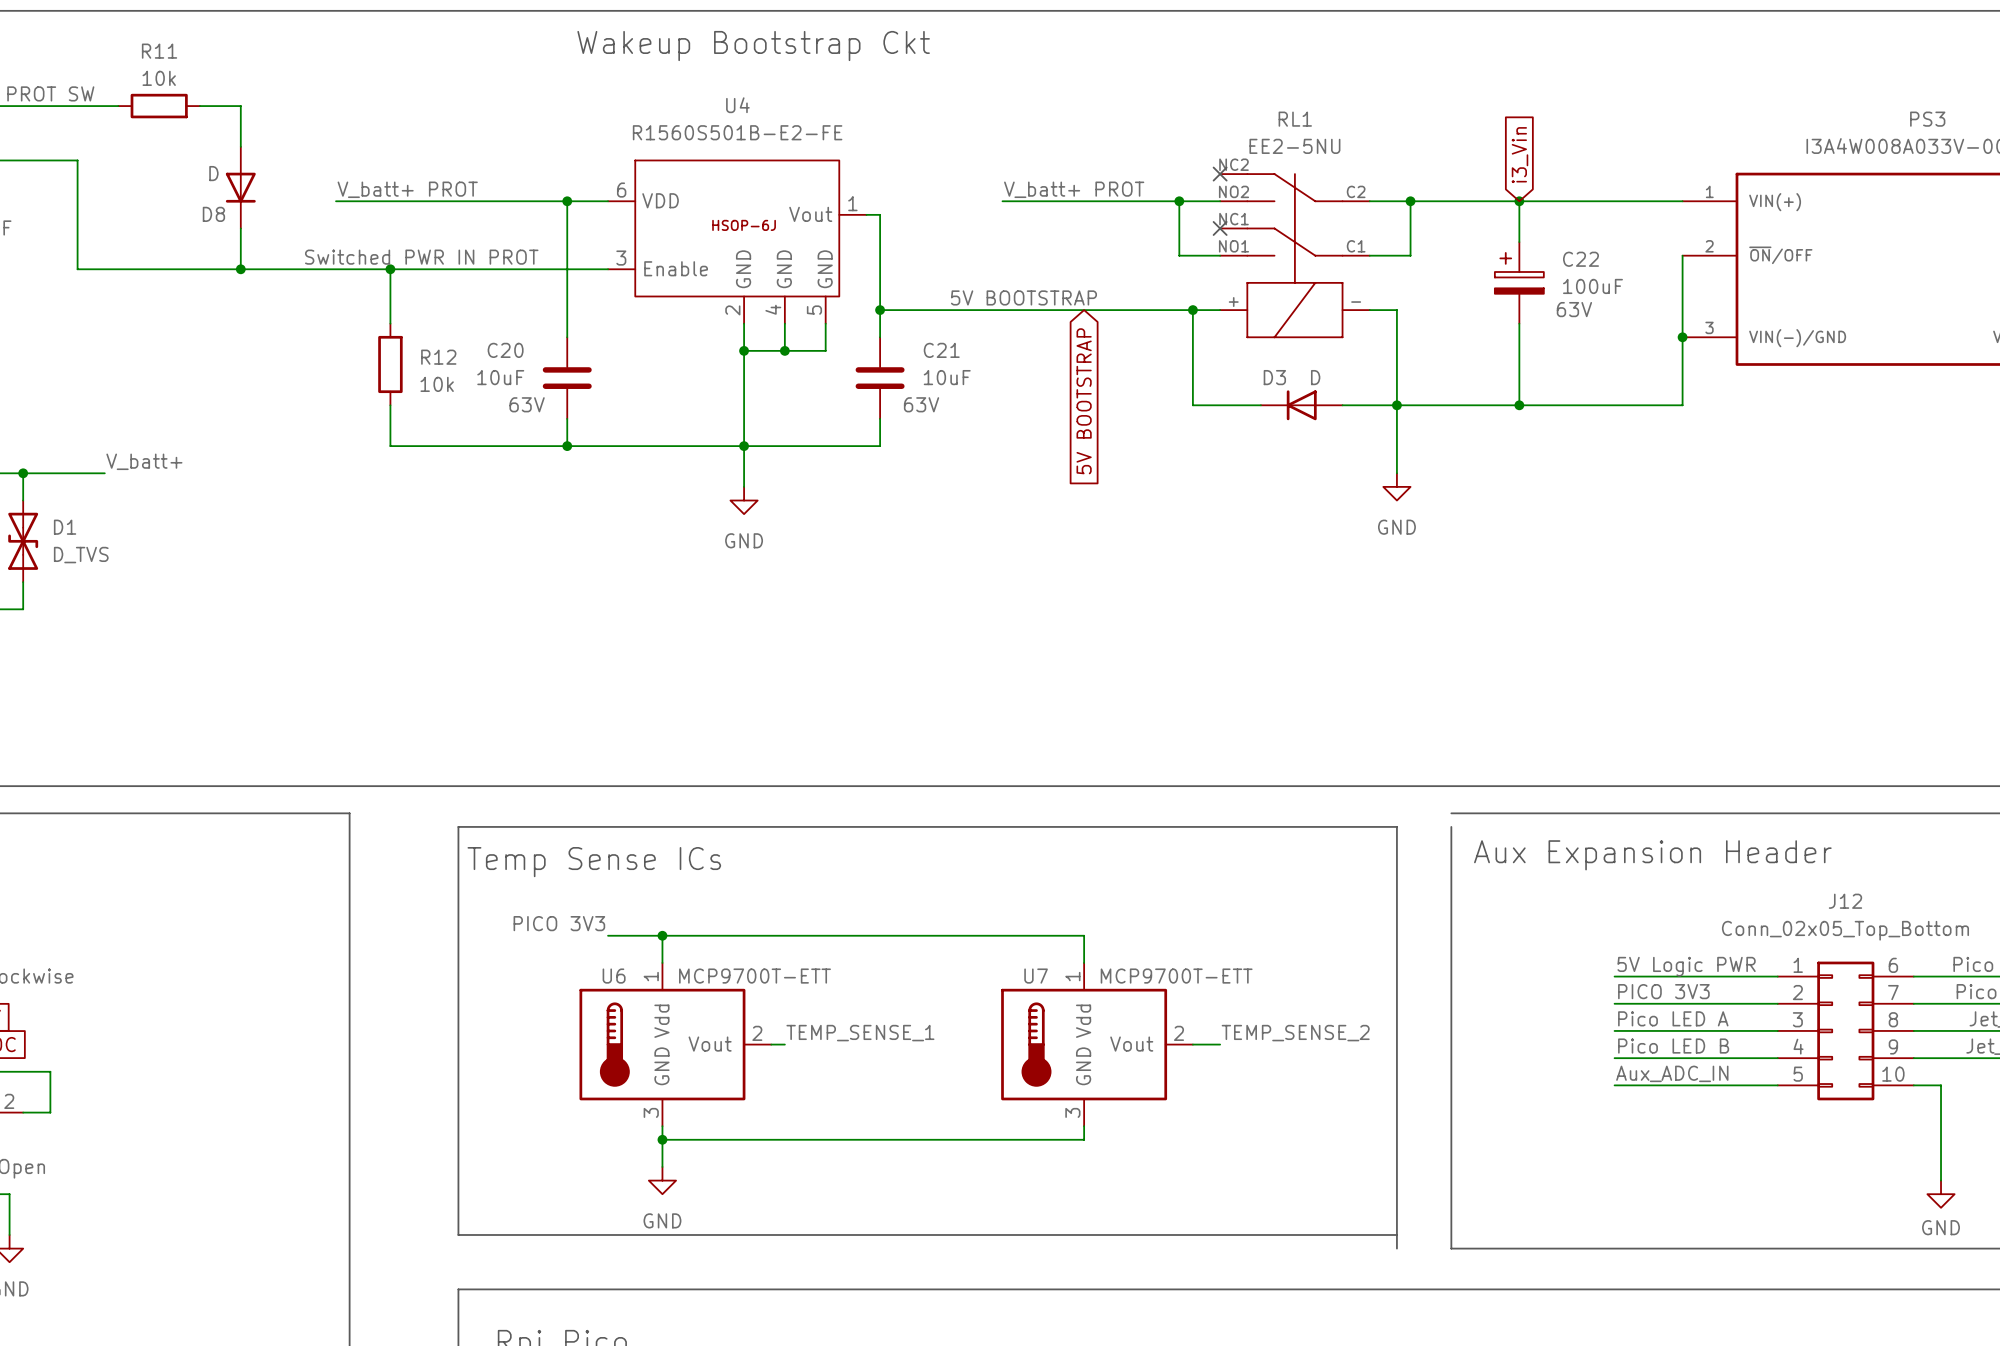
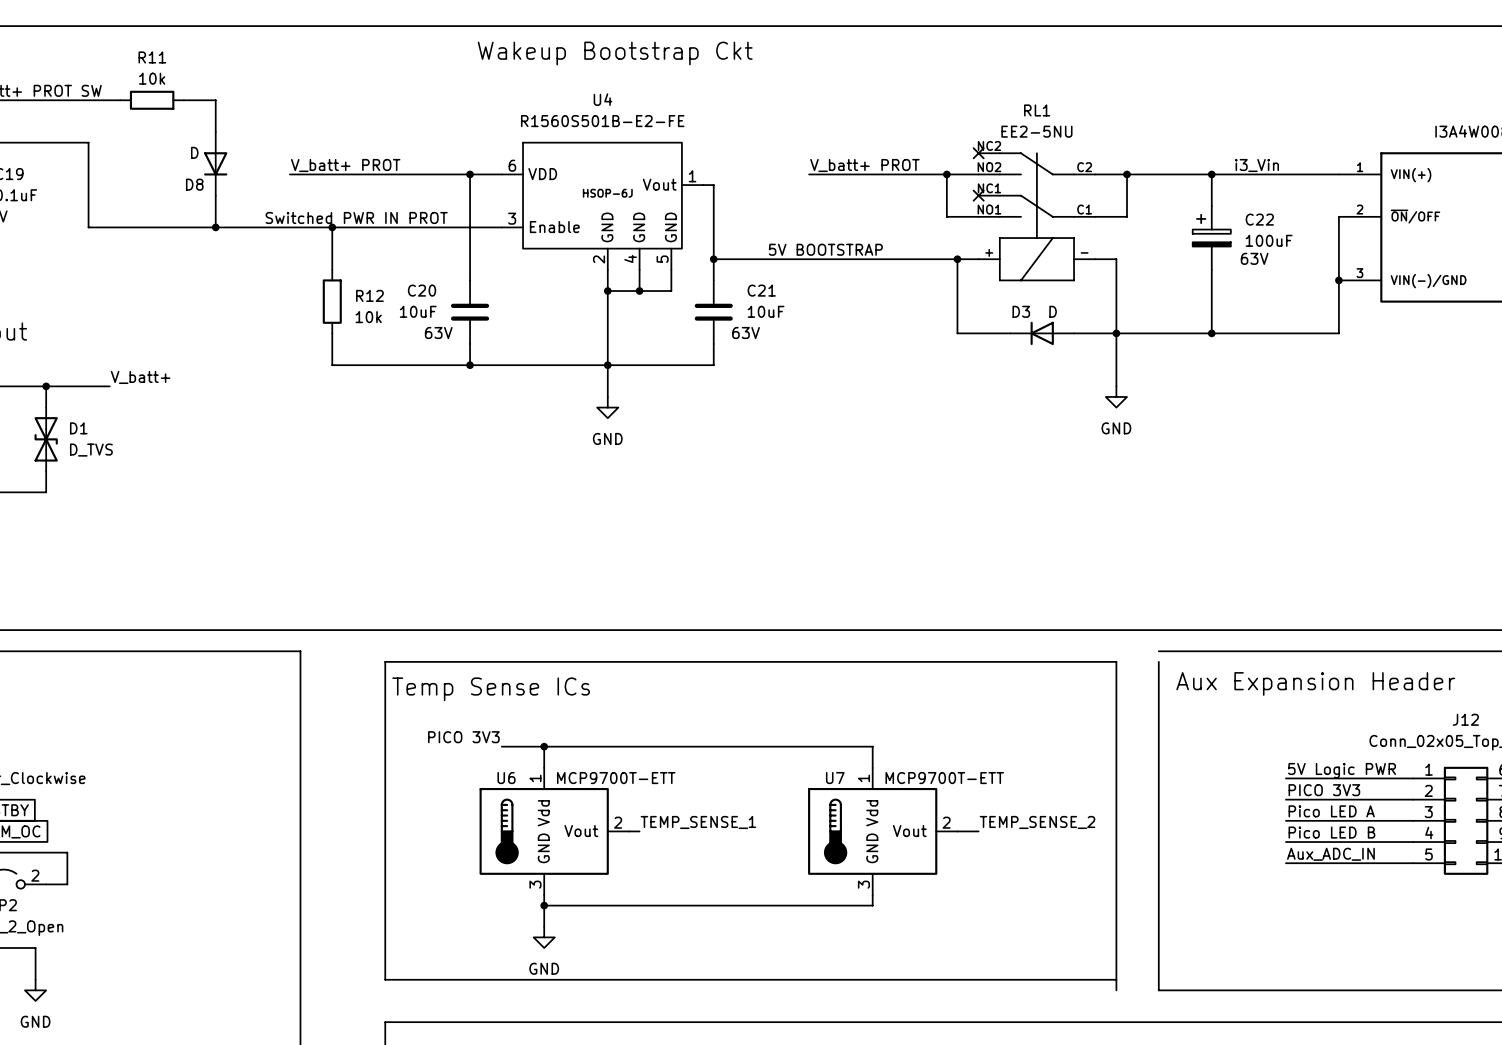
global label: i3_Vin (1520, 155) -> none
label: none -> i3_Vin (1257, 165)
global label: 5V BOOTSTRAP (1084, 401) -> none

